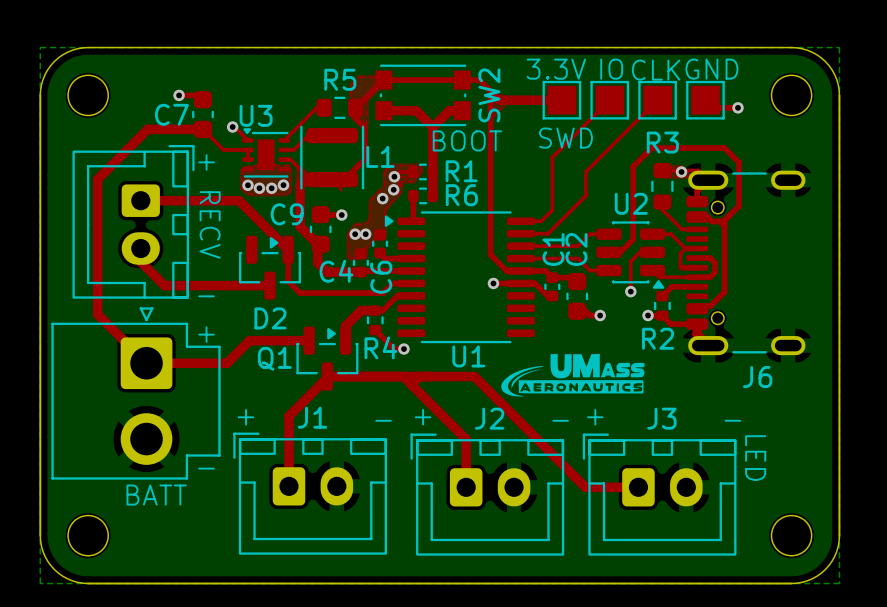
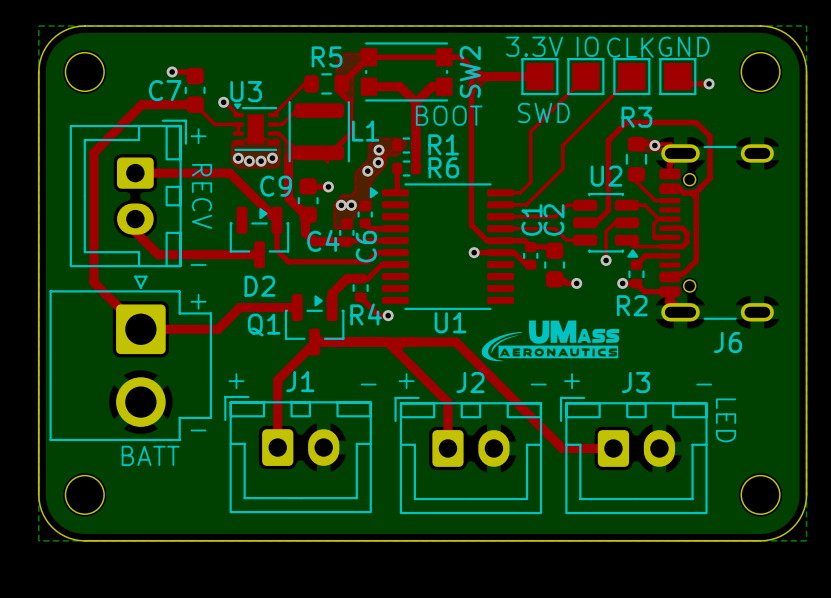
top track: (413, 171) (399, 171) (394, 176) -> none

